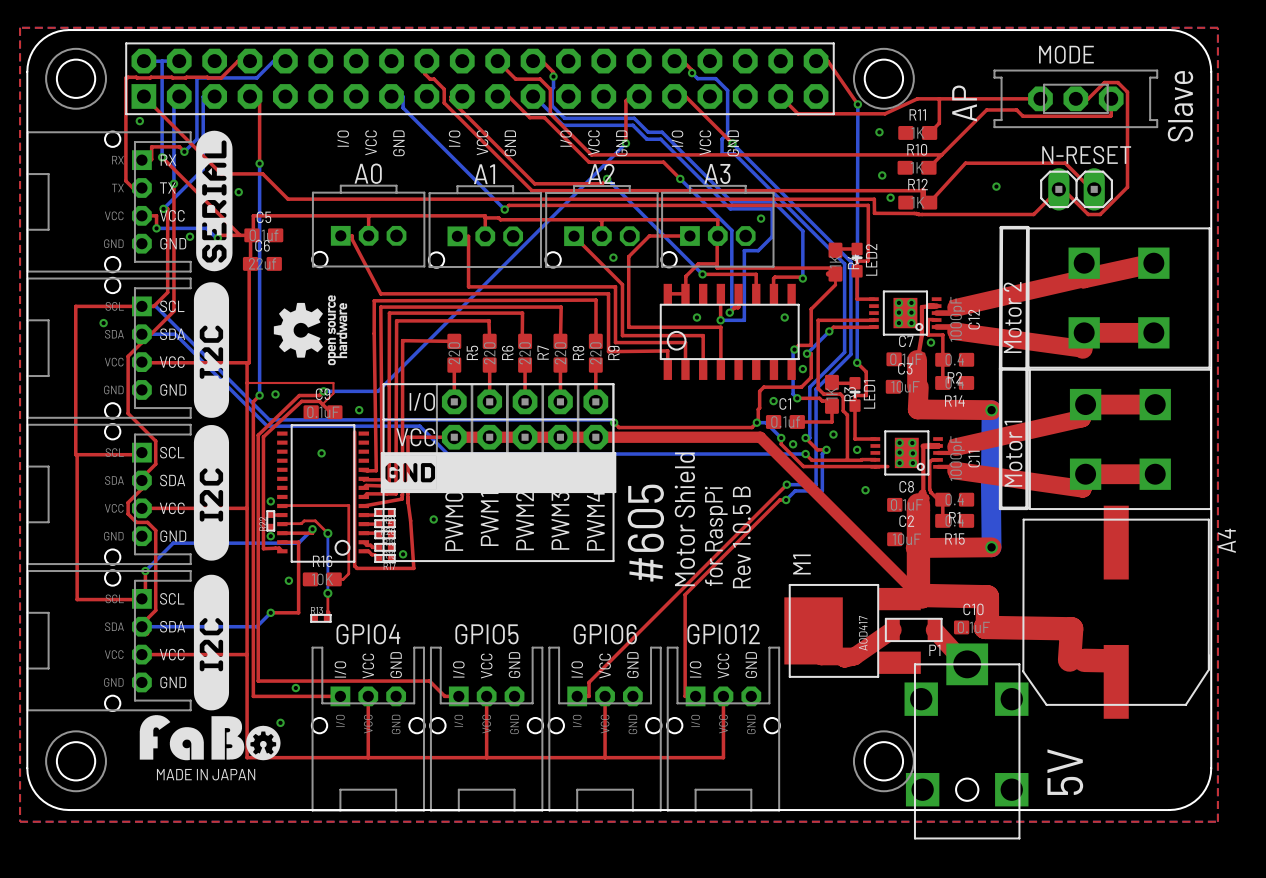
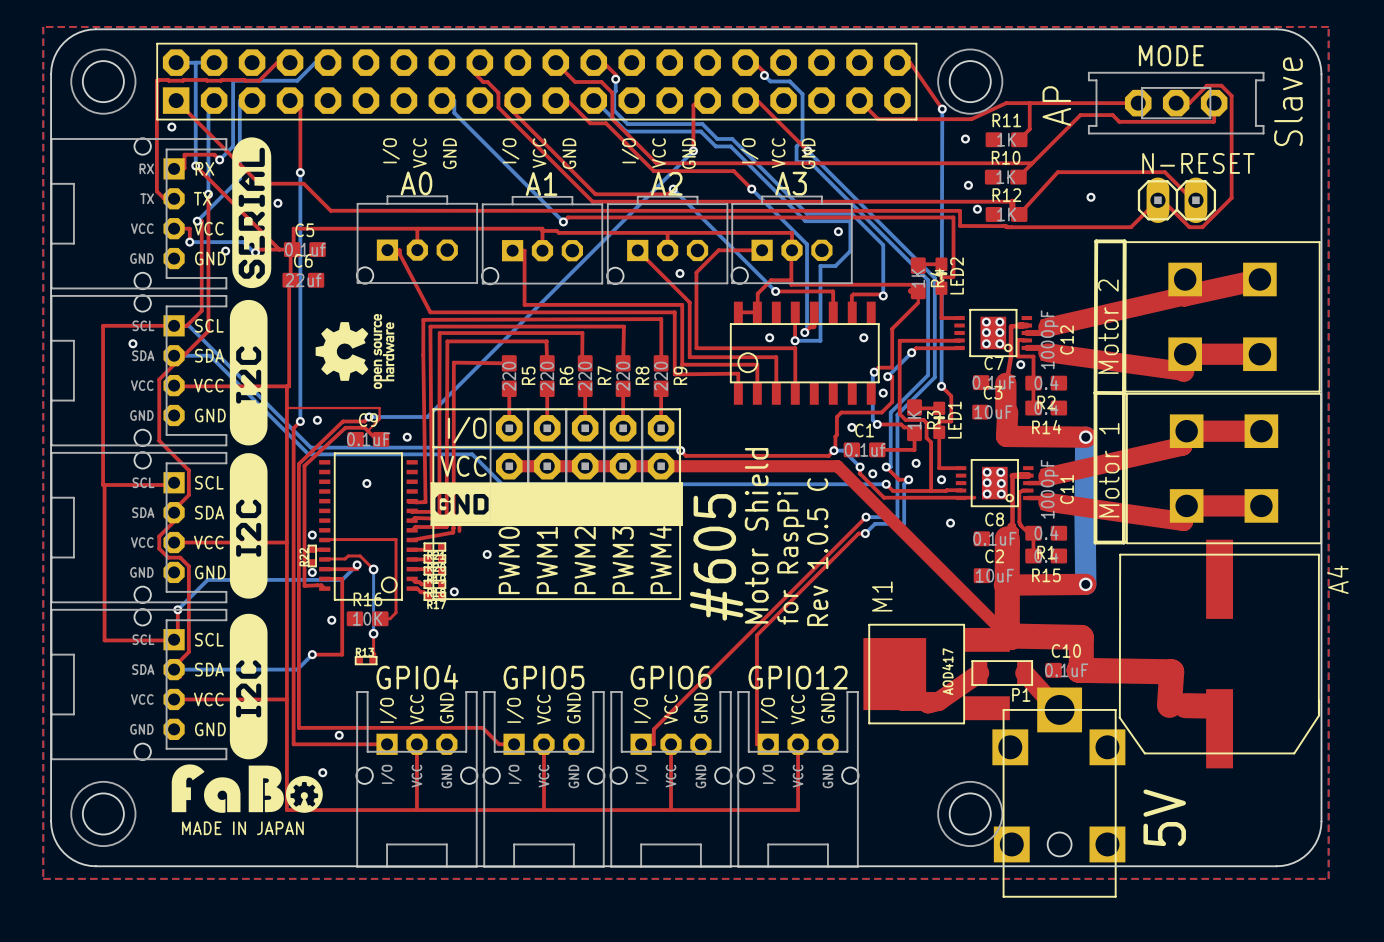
top track: (354, 432) (354, 566) (356, 568) (413, 568) (407, 497) (408, 503) -> none
top track: (454, 437) (407, 437) (408, 493) -> none
text: Rev 1.0.5 B (741, 537) -> Rev 1.0.5 C (817, 552)

